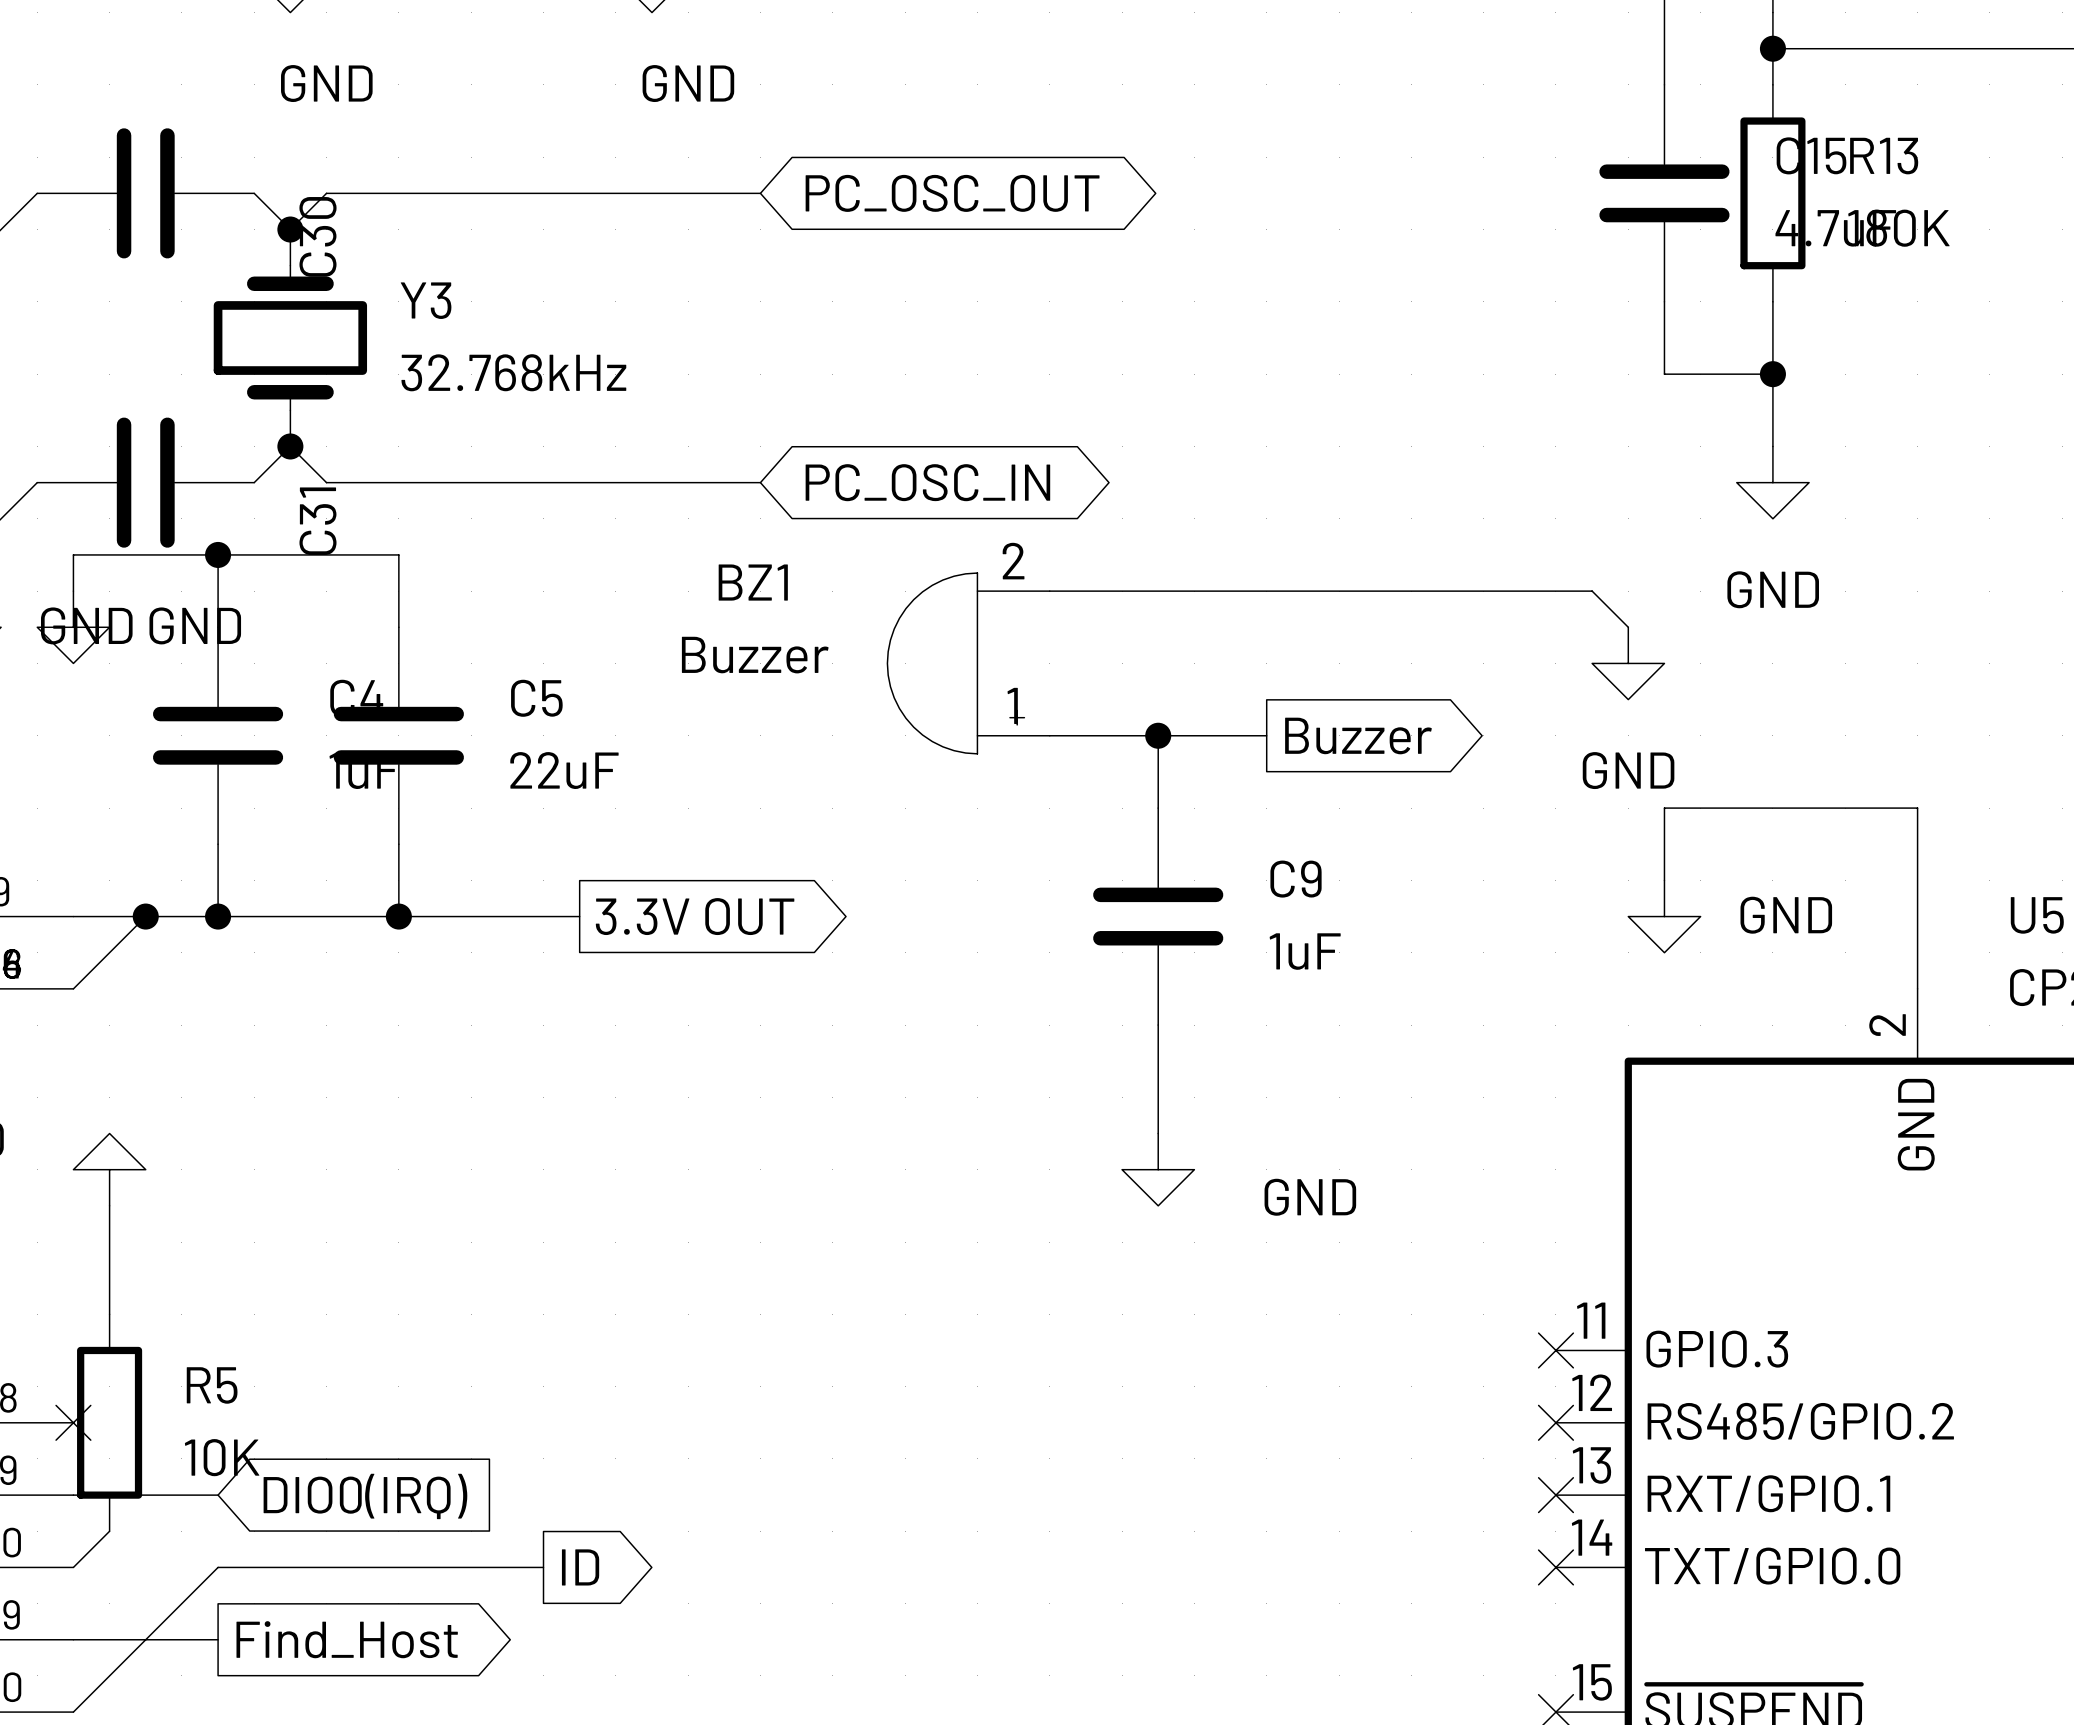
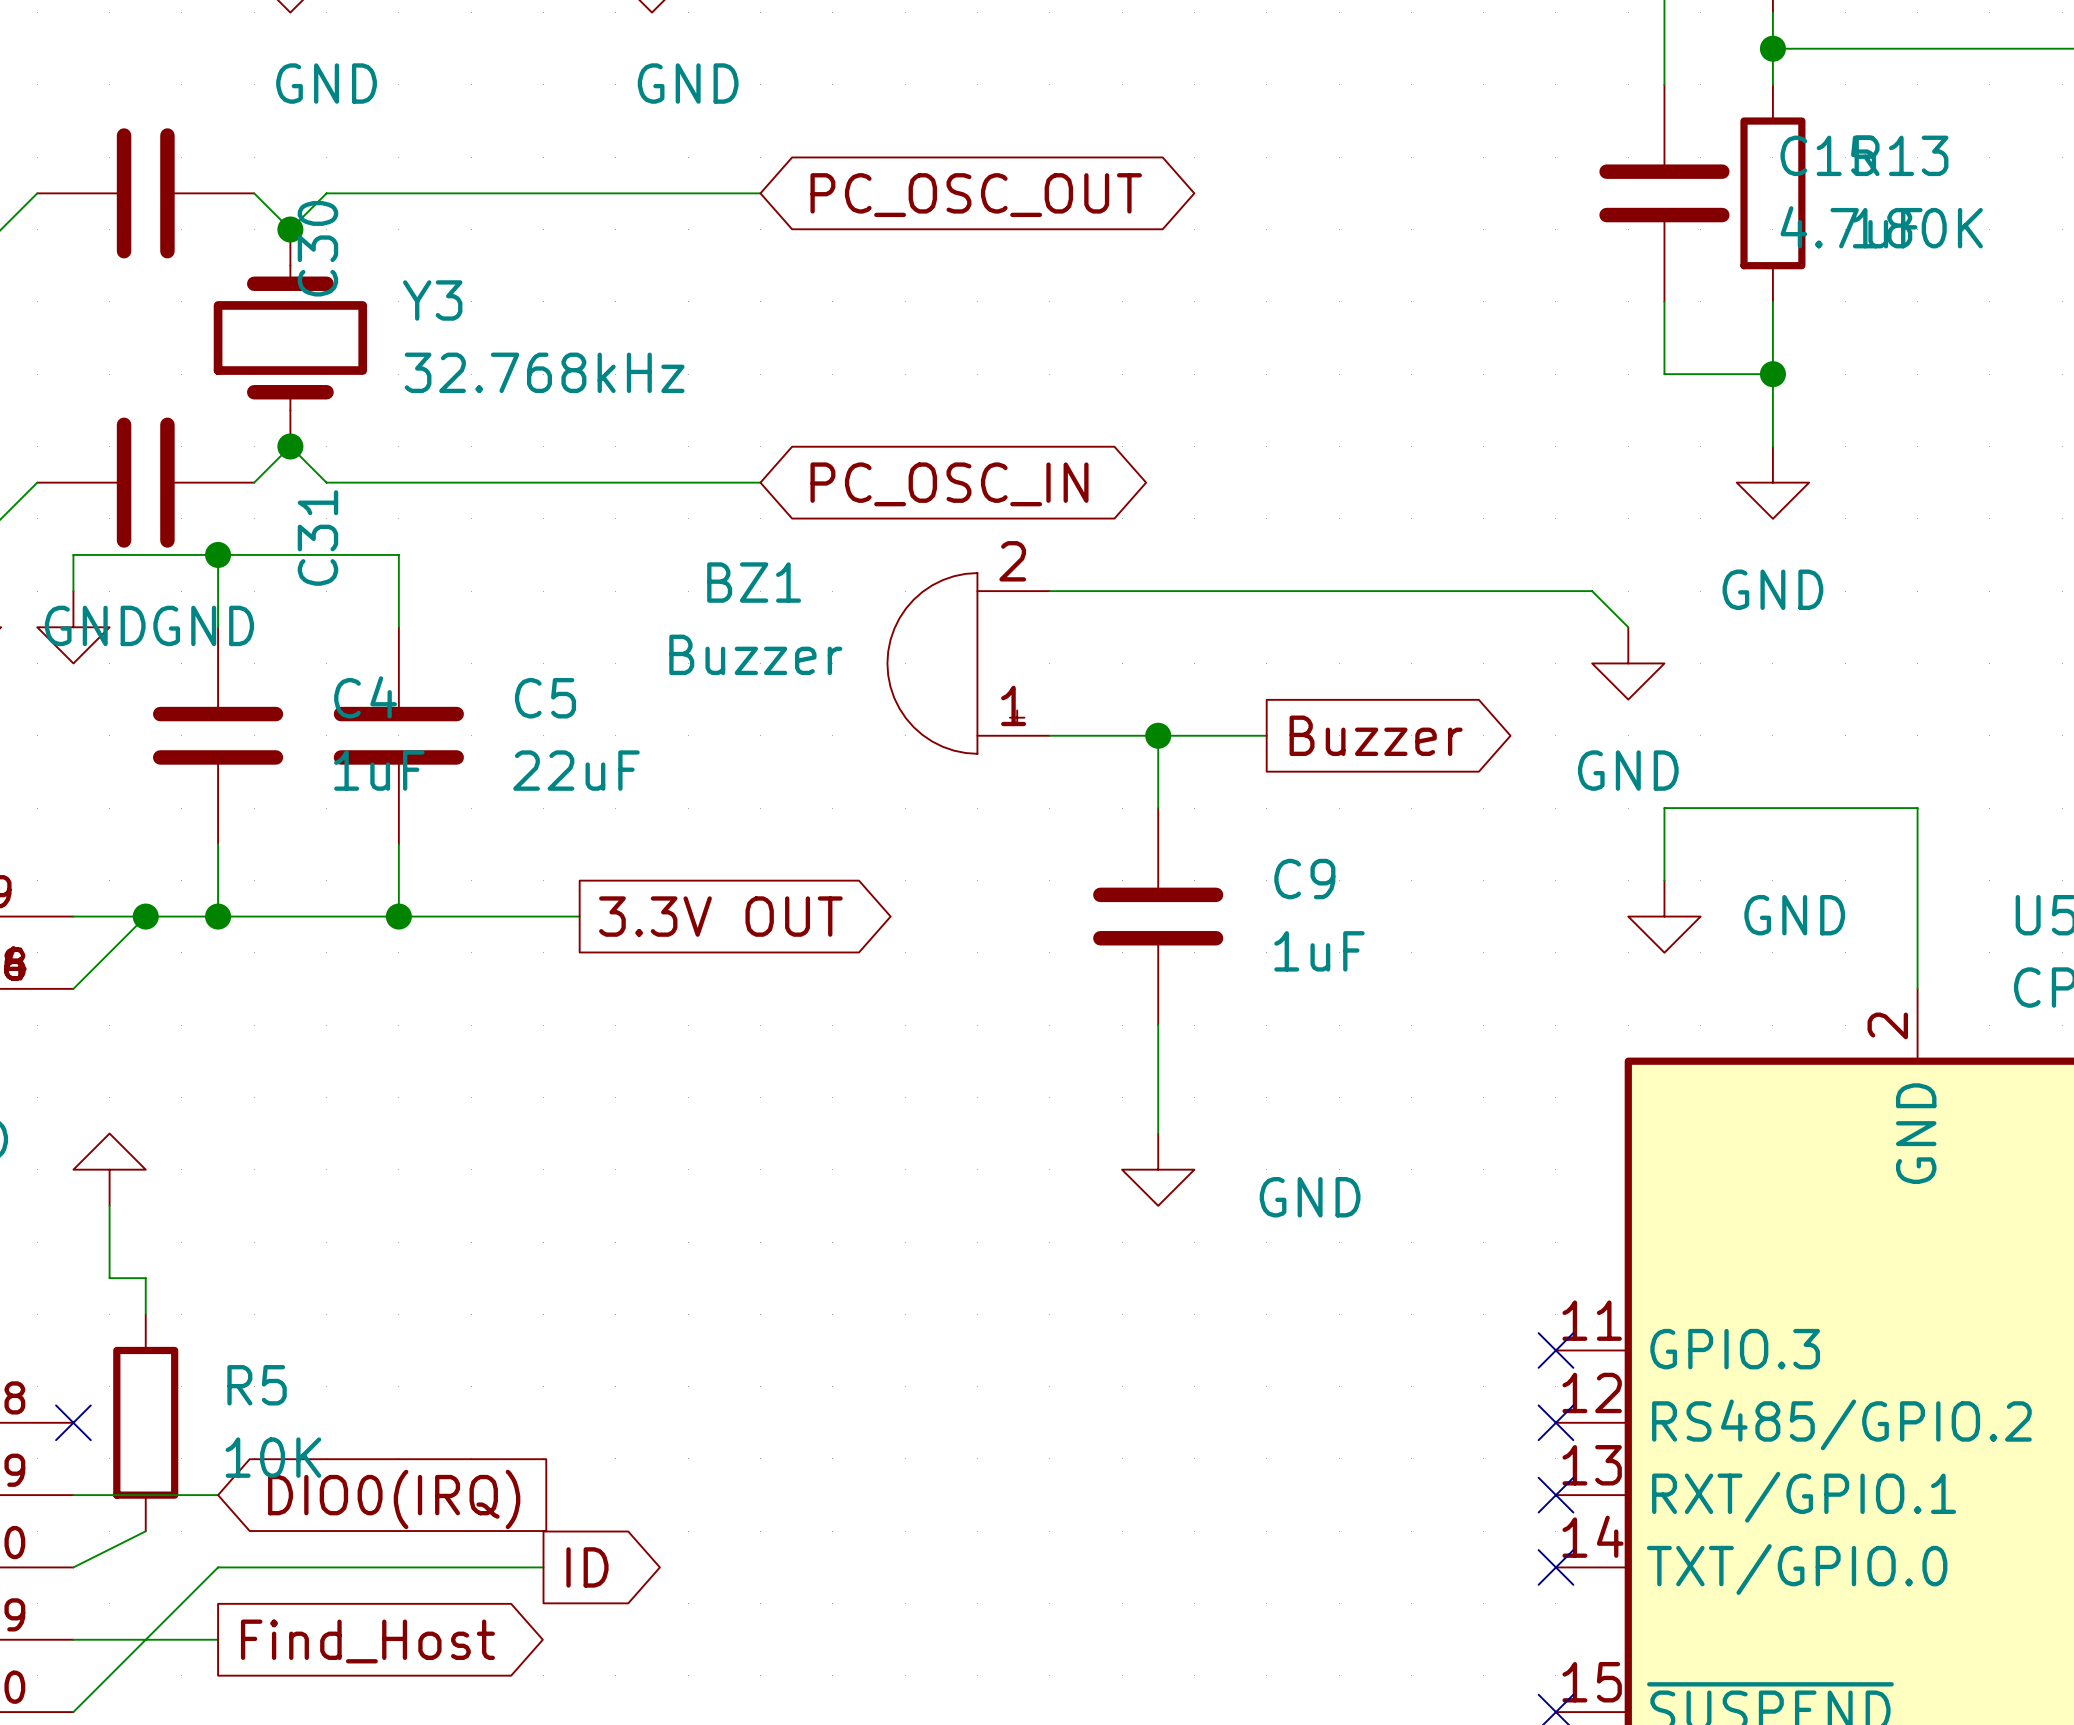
wire: (109, 1278) (109, 1314) -> (109, 1278) (145, 1278) (145, 1314)
R5 position: (109, 1422) -> (145, 1422)
wire: (109, 1531) (73, 1567) -> (145, 1531) (73, 1567)

